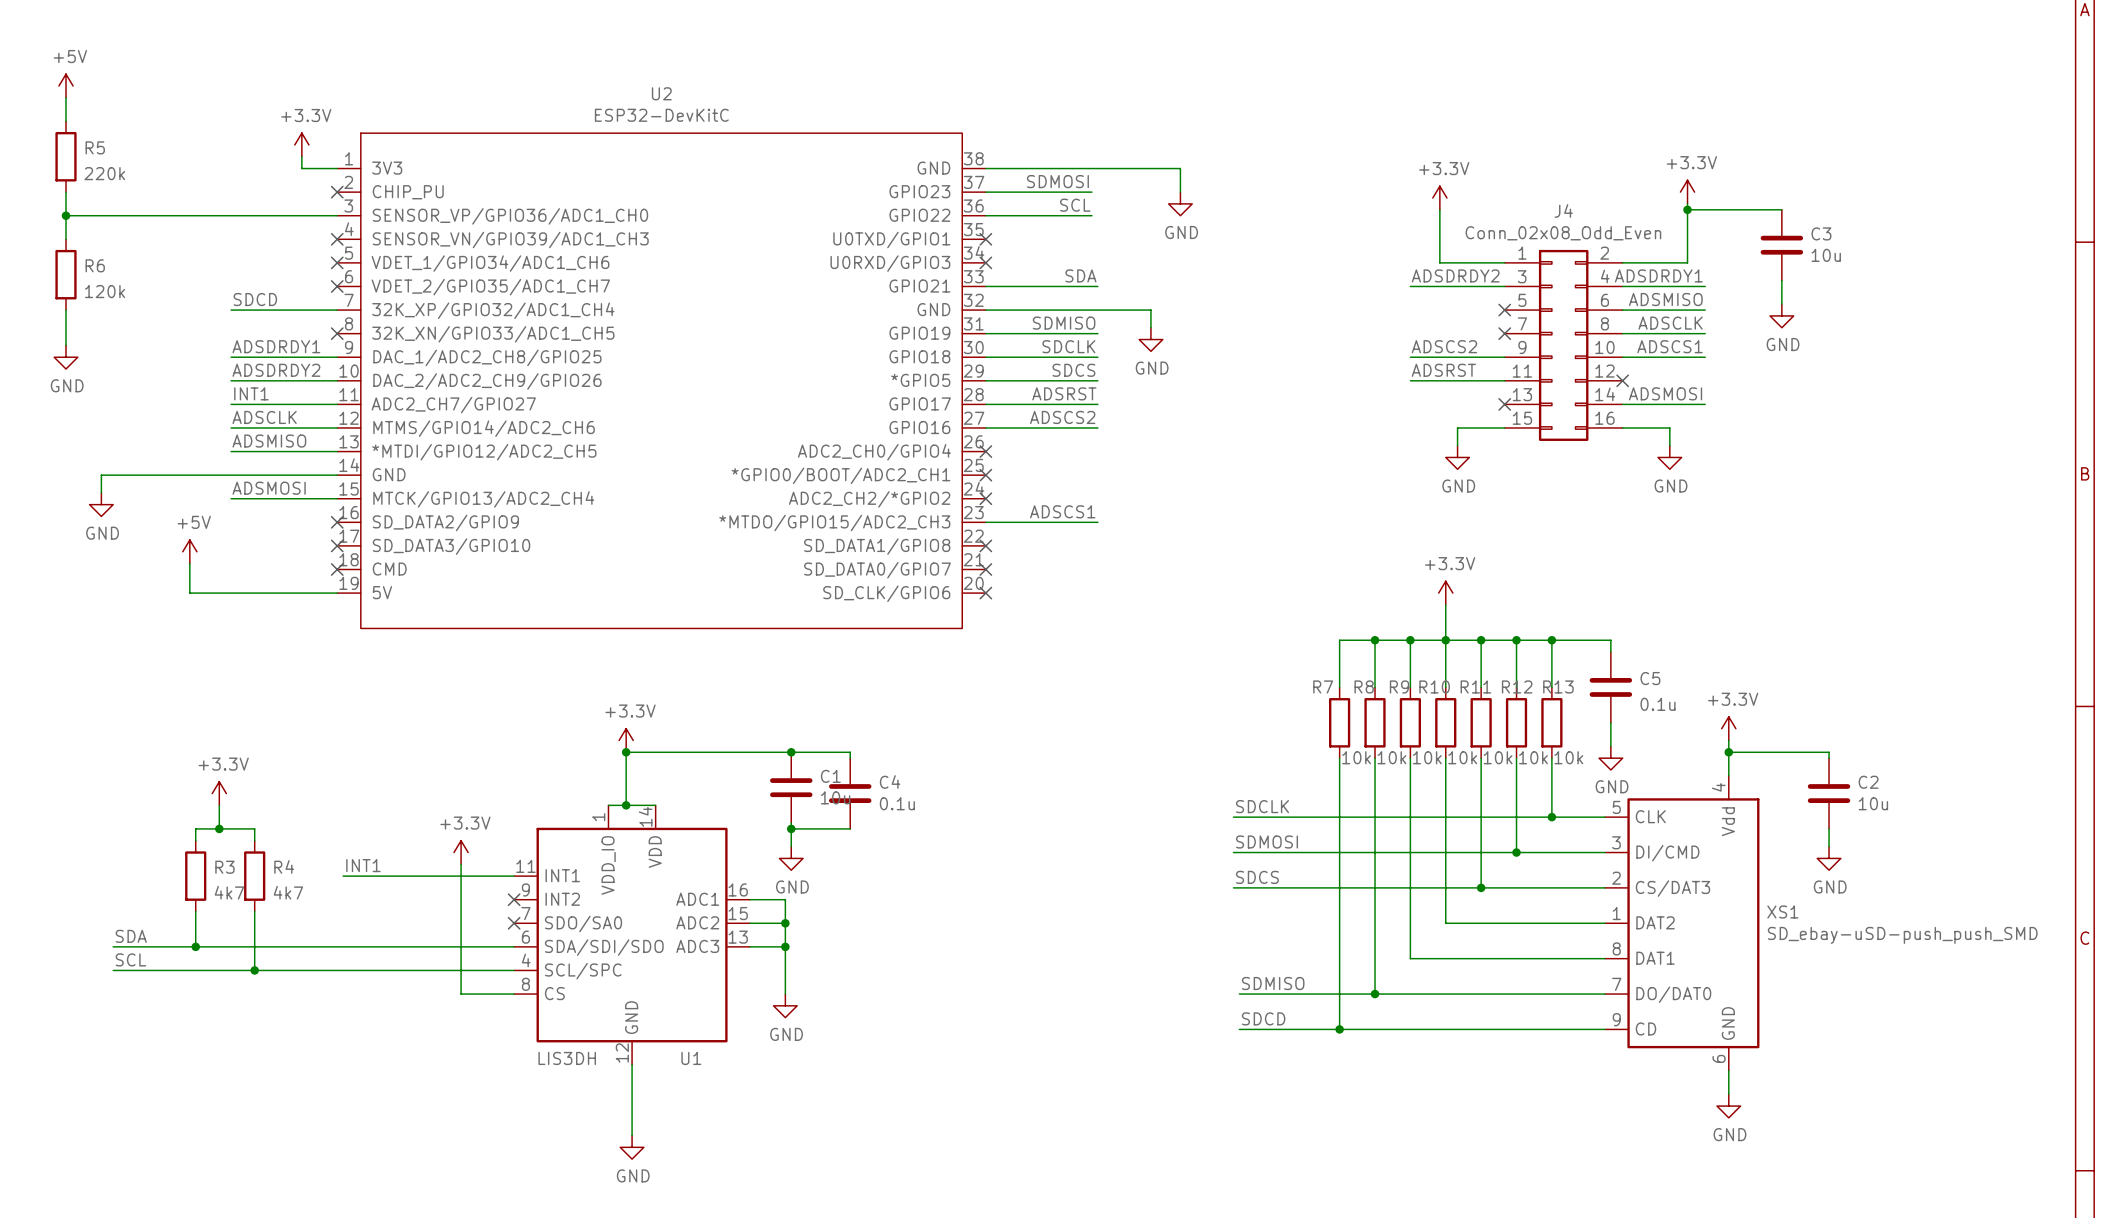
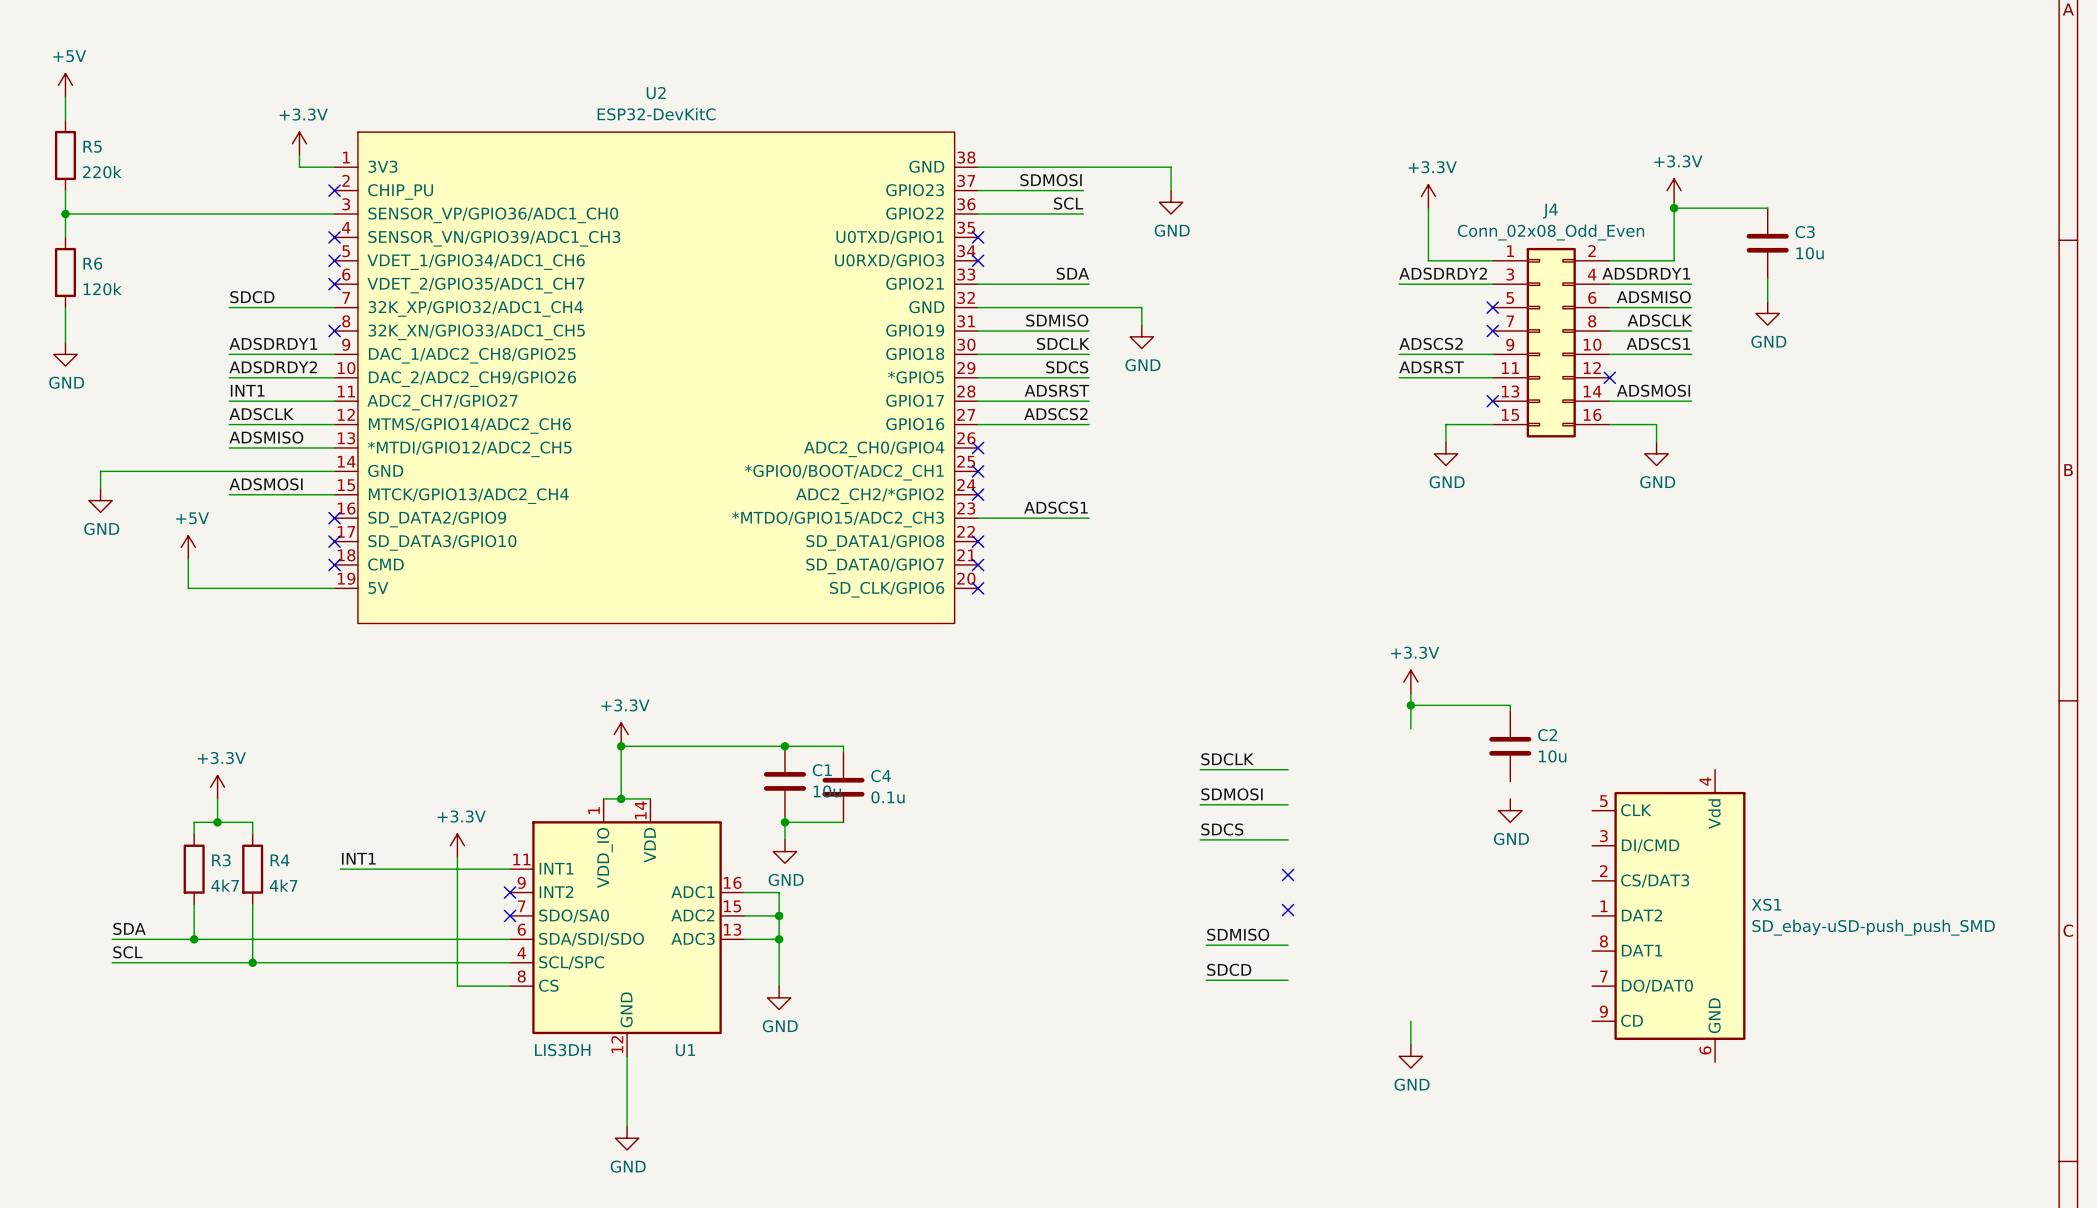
power symbol position: +3.3V (1445, 593) -> +3.3V (1410, 681)
wire: (1445, 604) (1445, 687) -> none
wire: (1375, 640) (1375, 687) -> none
junction: (1375, 640) -> none
wire: (1410, 640) (1410, 687) -> none
junction: (1410, 640) -> none
junction: (1445, 640) -> none
wire: (1481, 640) (1481, 687) -> none
junction: (1481, 640) -> none
wire: (1516, 640) (1516, 687) -> none
junction: (1516, 640) -> none
wire: (1551, 640) (1551, 687) -> none
junction: (1551, 640) -> none
wire: (1610, 652) (1610, 640) (1339, 640) (1339, 687) -> none
C5: 0.1u (1610, 687) -> none
wire: none -> (1410, 693) (1410, 728)
wire: none -> (1410, 705) (1510, 705) (1510, 711)
junction: none -> (1410, 705)
R7: 10k (1339, 722) -> none
R8: 10k (1375, 722) -> none
R9: 10k (1410, 722) -> none
R10: 10k (1445, 722) -> none
R11: 10k (1481, 722) -> none
R12: 10k (1516, 722) -> none
R13: 10k (1551, 722) -> none
wire: (1610, 722) (1610, 746) -> none
power symbol: +3.3V (1728, 728) -> none
wire: (1728, 740) (1728, 775) -> none
wire: (1728, 752) (1829, 752) (1829, 758) -> none
junction: (1728, 752) -> none
wire: (1339, 758) (1339, 1029) -> none
wire: (1375, 758) (1375, 994) -> none
wire: (1410, 758) (1410, 958) (1604, 958) -> none
wire: (1445, 758) (1445, 923) (1604, 923) -> none
wire: (1481, 758) (1481, 887) -> none
wire: (1516, 758) (1516, 852) -> none
wire: (1551, 758) (1551, 817) -> none
power symbol position: GND (1610, 758) -> GND (1510, 810)
wire: none -> (1200, 769) (1288, 769)
C2 position: (1829, 793) -> (1510, 746)
label position: SDCLK (1262, 806) -> SDCLK (1227, 759)
wire: none -> (1200, 804) (1288, 804)
wire: (1233, 817) (1604, 817) -> none
junction: (1551, 817) -> none
wire: (1829, 828) (1829, 846) -> none
label position: SDMOSI (1266, 842) -> SDMOSI (1232, 794)
wire: none -> (1200, 839) (1288, 839)
wire: (1233, 852) (1604, 852) -> none
junction: (1516, 852) -> none
power symbol: GND (1829, 858) -> none
label position: SDCS (1257, 877) -> SDCS (1222, 829)
no-connect mark: none -> (1288, 875)
wire: (1233, 887) (1604, 887) -> none
junction: (1481, 887) -> none
no-connect mark: none -> (1288, 910)
wire: none -> (1206, 945) (1288, 945)
label position: SDMISO (1273, 983) -> SDMISO (1238, 934)
wire: none -> (1206, 980) (1288, 980)
wire: (1239, 994) (1604, 994) -> none
junction: (1375, 994) -> none
label position: SDCD (1263, 1018) -> SDCD (1229, 969)
wire: (1239, 1029) (1604, 1029) -> none
junction: (1339, 1029) -> none
wire: none -> (1410, 1021) (1410, 1044)
power symbol: none -> GND (1410, 1056)
wire: (1728, 1070) (1728, 1094) -> none
power symbol: GND (1728, 1106) -> none

